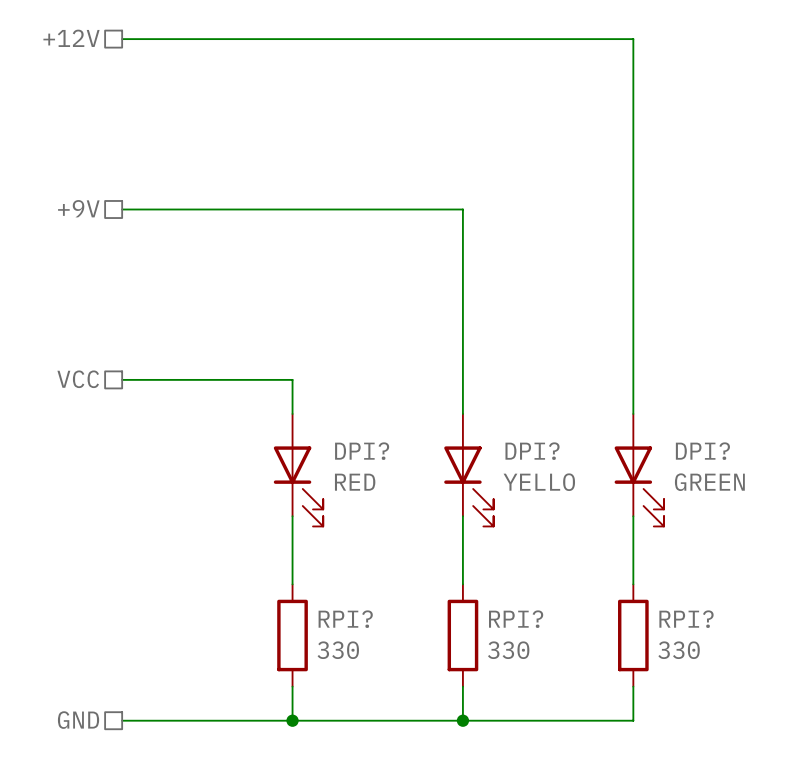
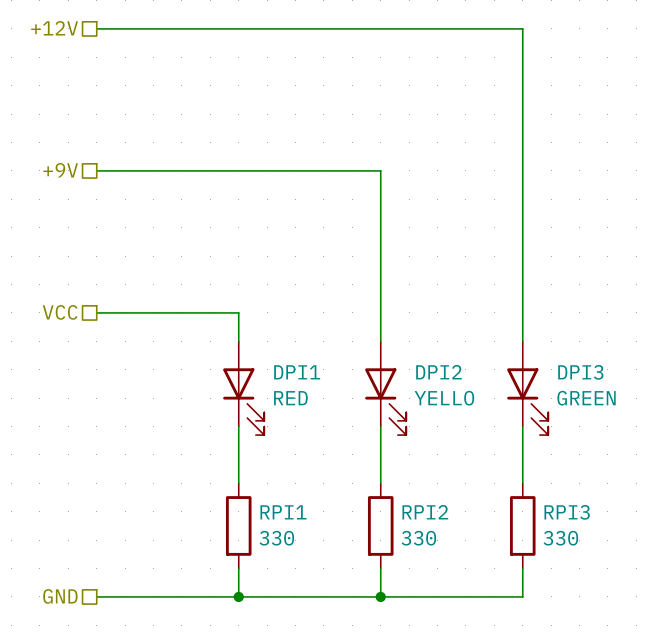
DPI? name: DPI? (362, 451) -> DPI1 (297, 372)
DPI? name: DPI? (532, 451) -> DPI2 (439, 372)
DPI? name: DPI? (702, 451) -> DPI3 (580, 372)
RPI? name: RPI? (345, 619) -> RPI1 (283, 512)
RPI? name: RPI? (516, 619) -> RPI2 (425, 512)
RPI? name: RPI? (686, 619) -> RPI3 (567, 512)

